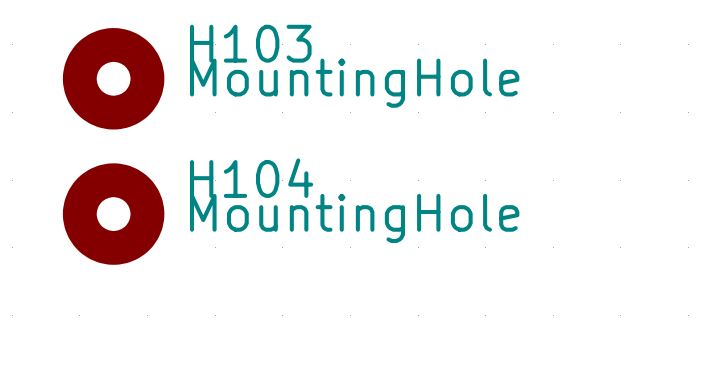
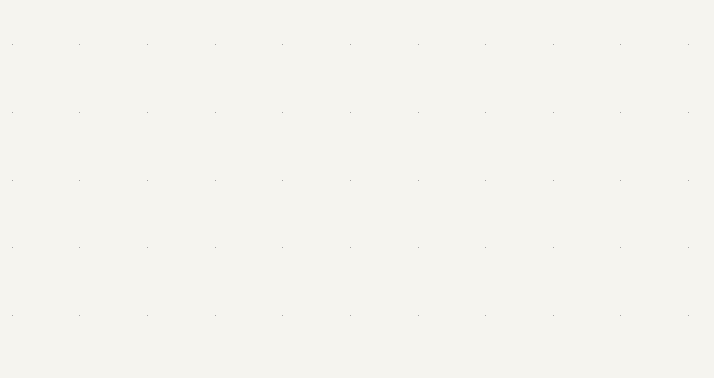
H103: MountingHole (113, 78) -> none
H104: MountingHole (113, 214) -> none

